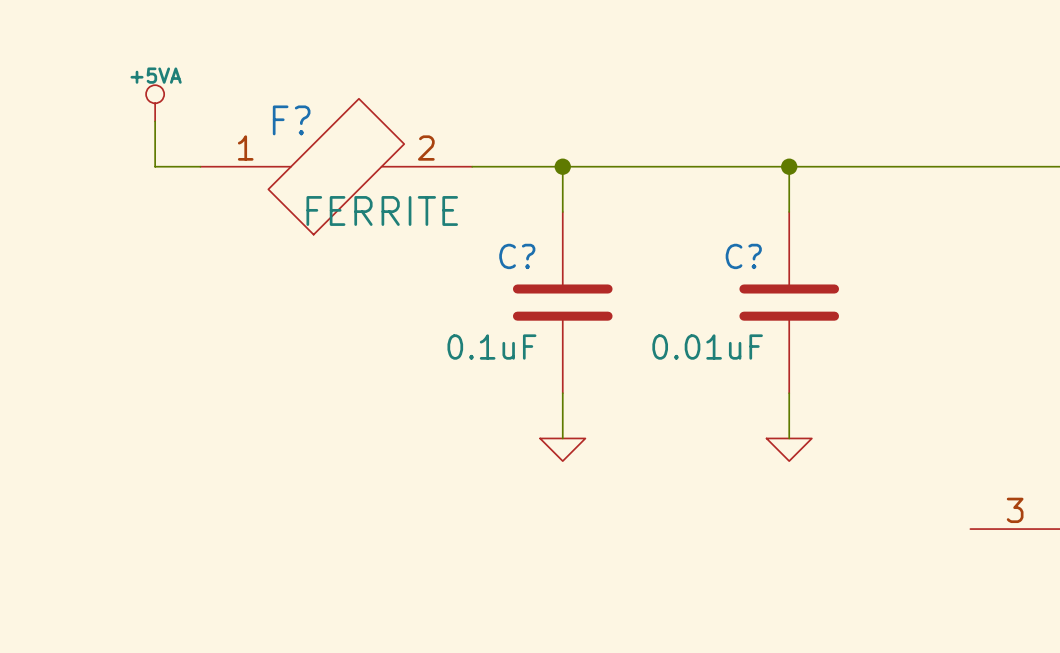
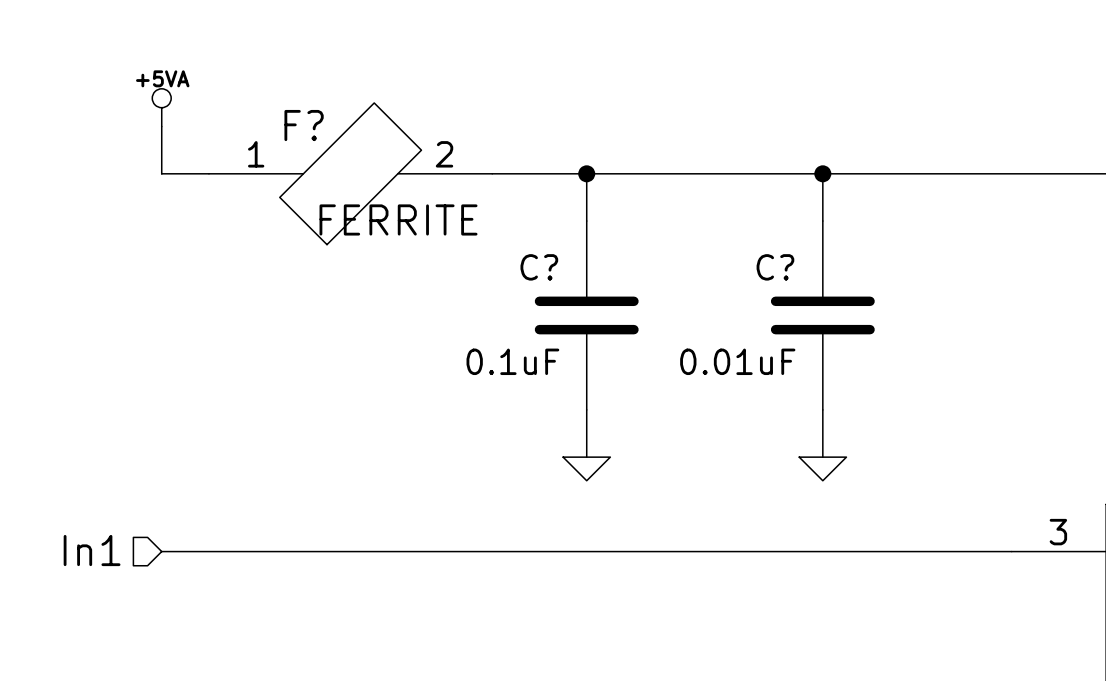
hierarchical label: none -> In1 (92, 550)
wire: none -> (161, 551) (1011, 551)

